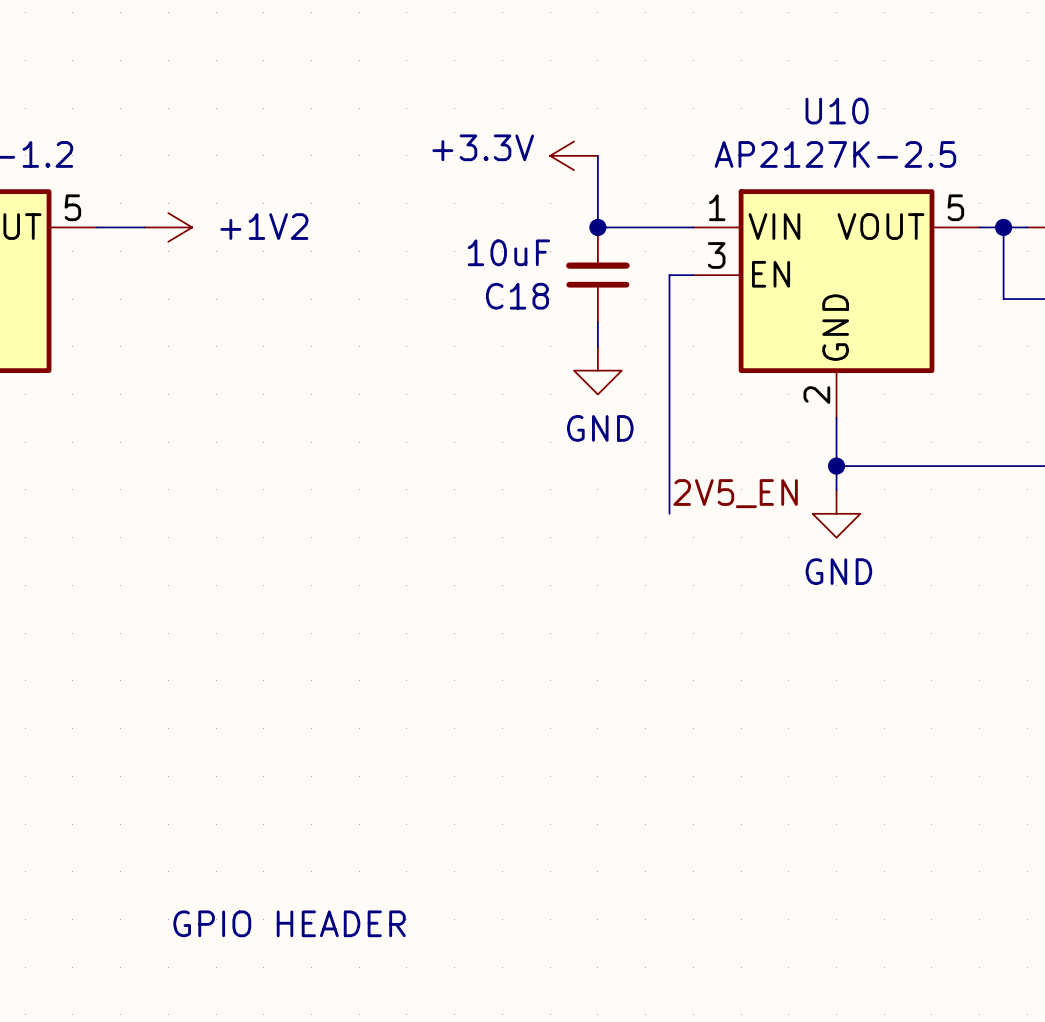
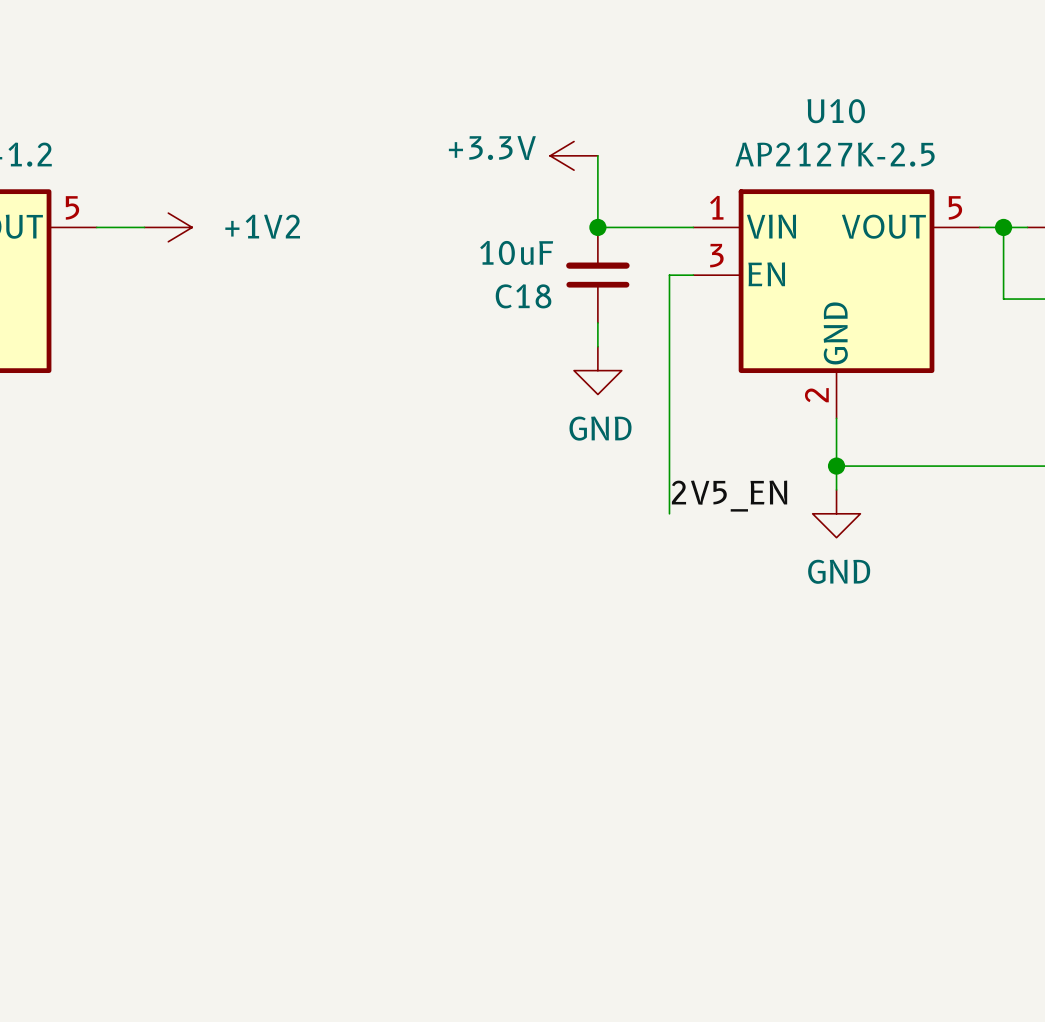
text: GPIO HEADER (289, 923) -> none

